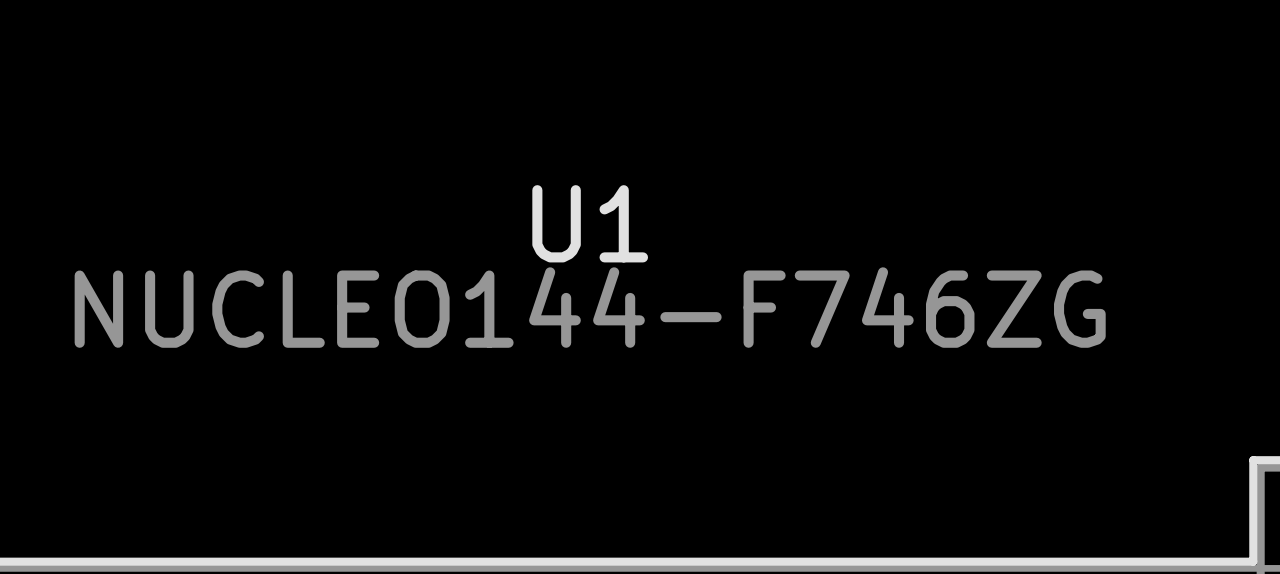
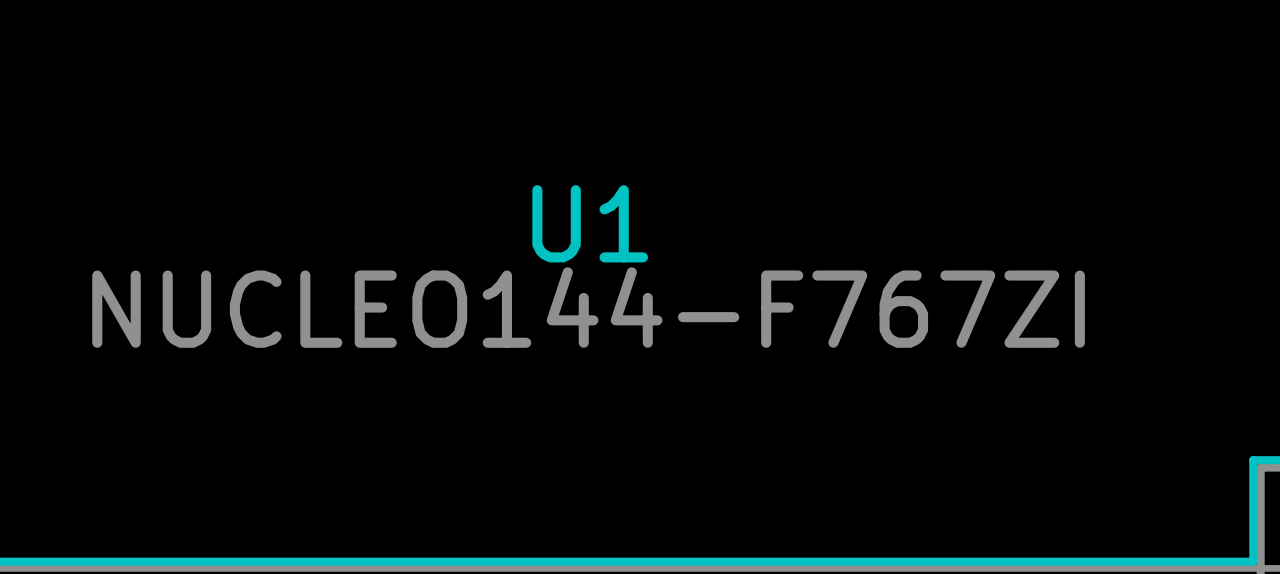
U1 value: NUCLEO144-F746ZG (590, 307) -> NUCLEO144-F767ZI (588, 307)

